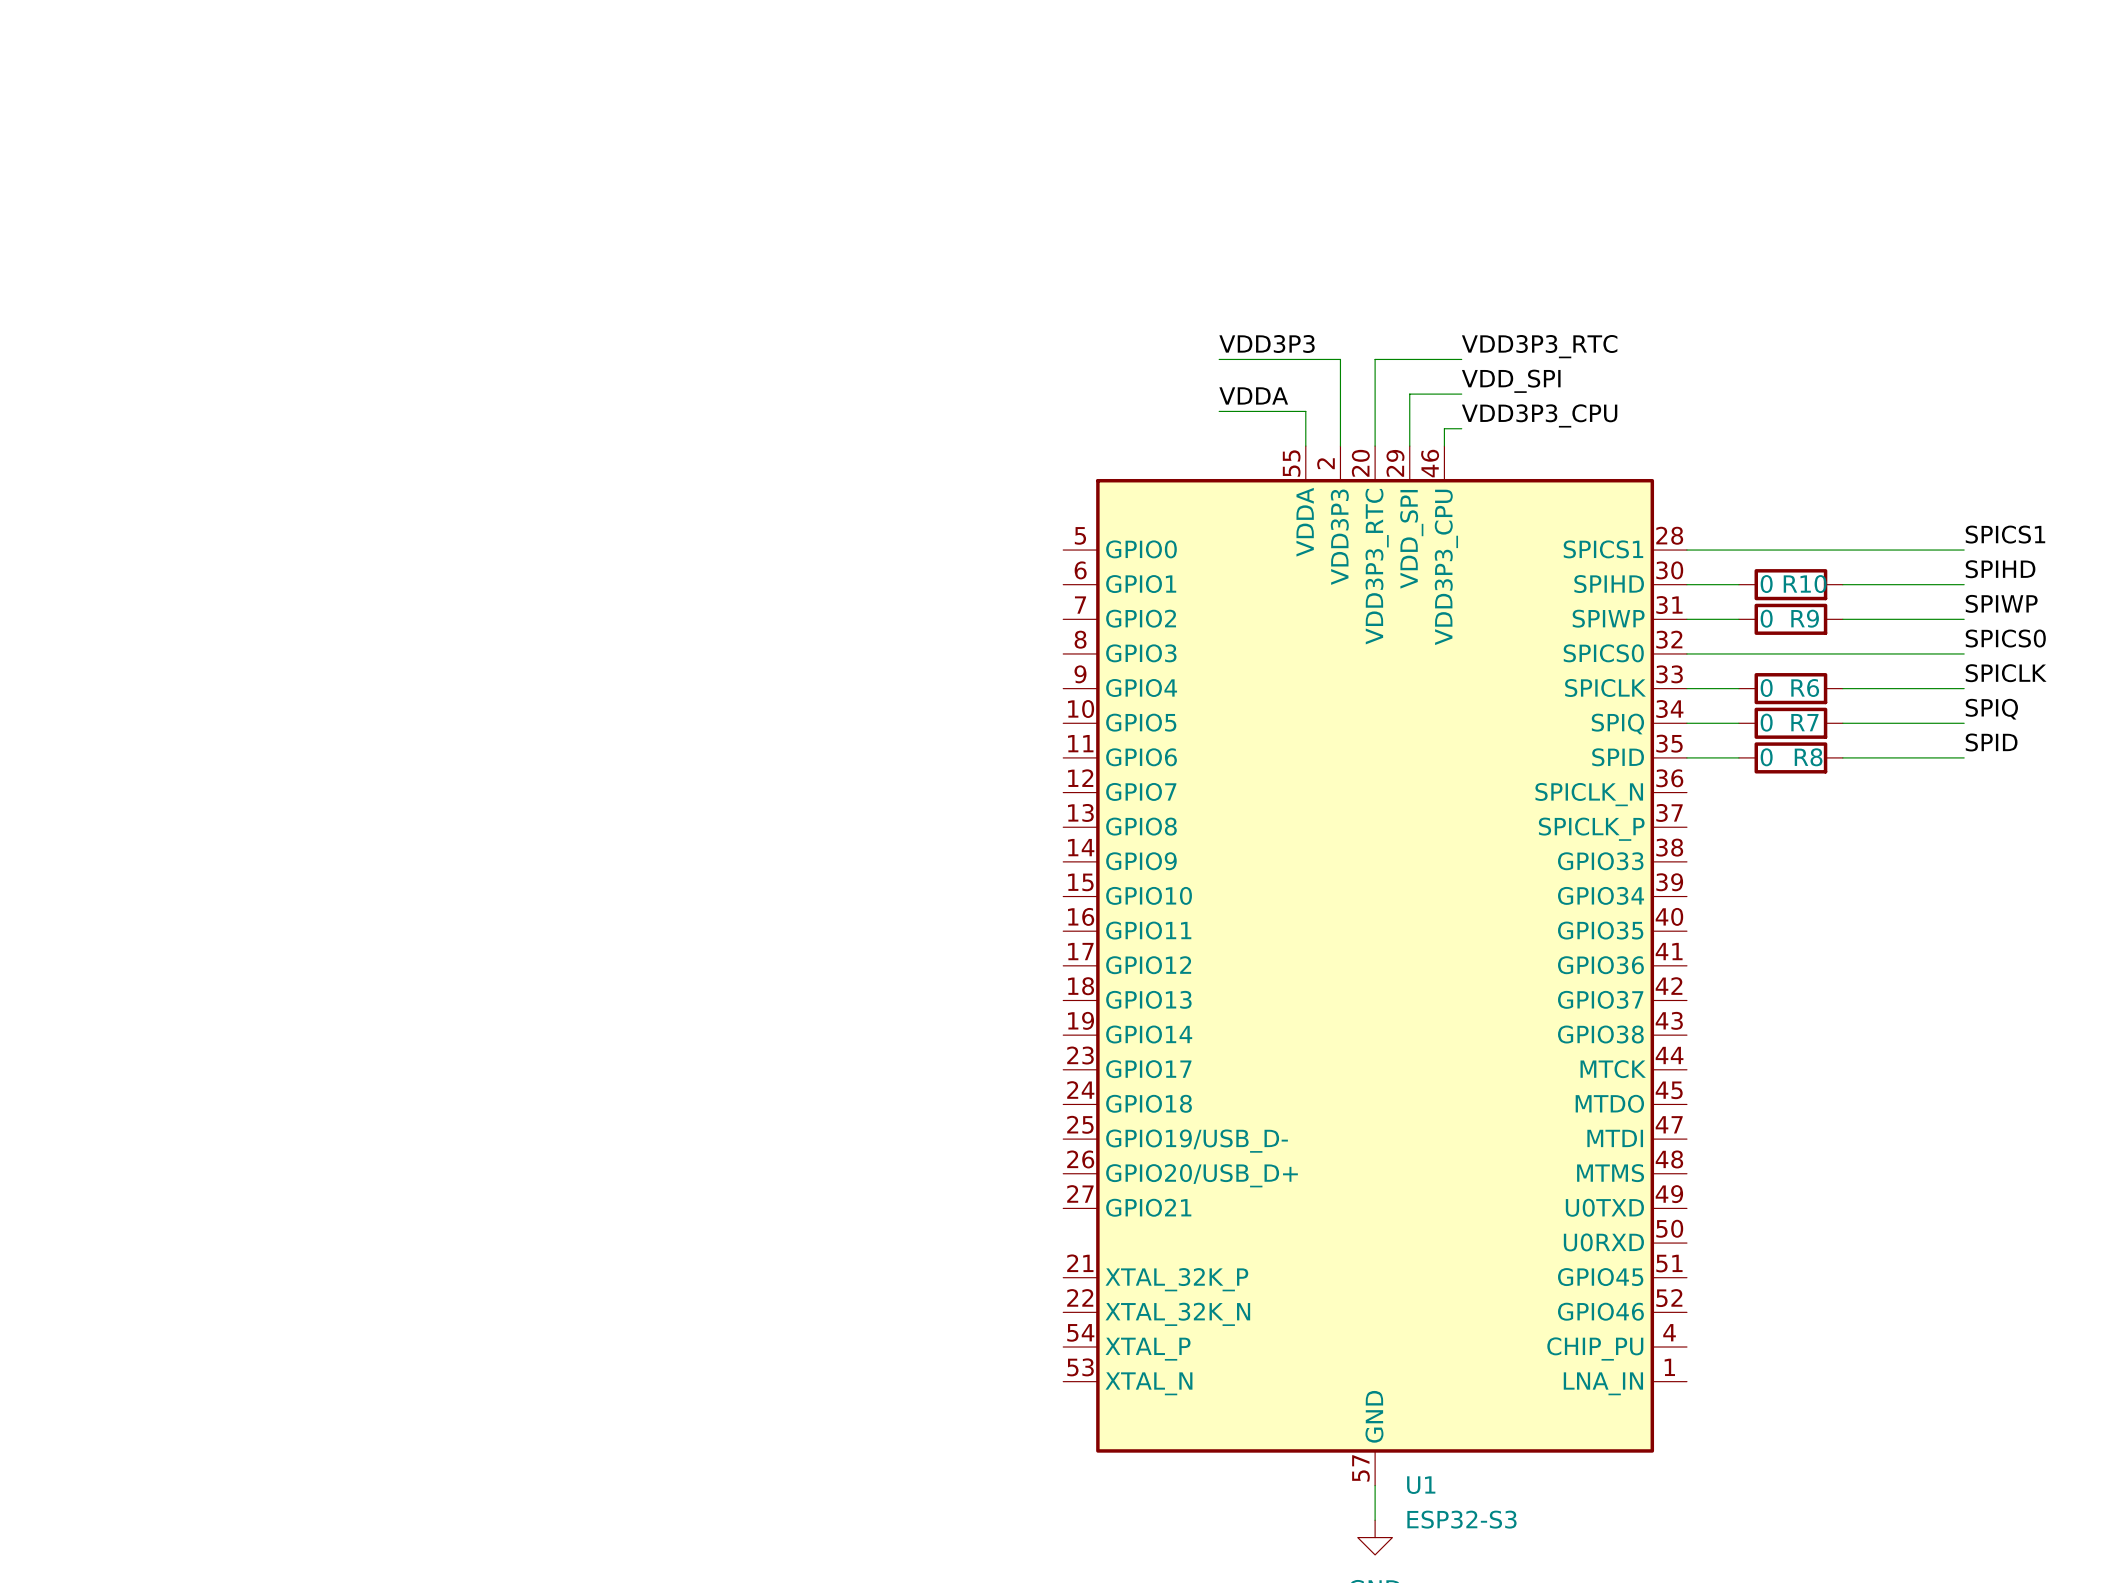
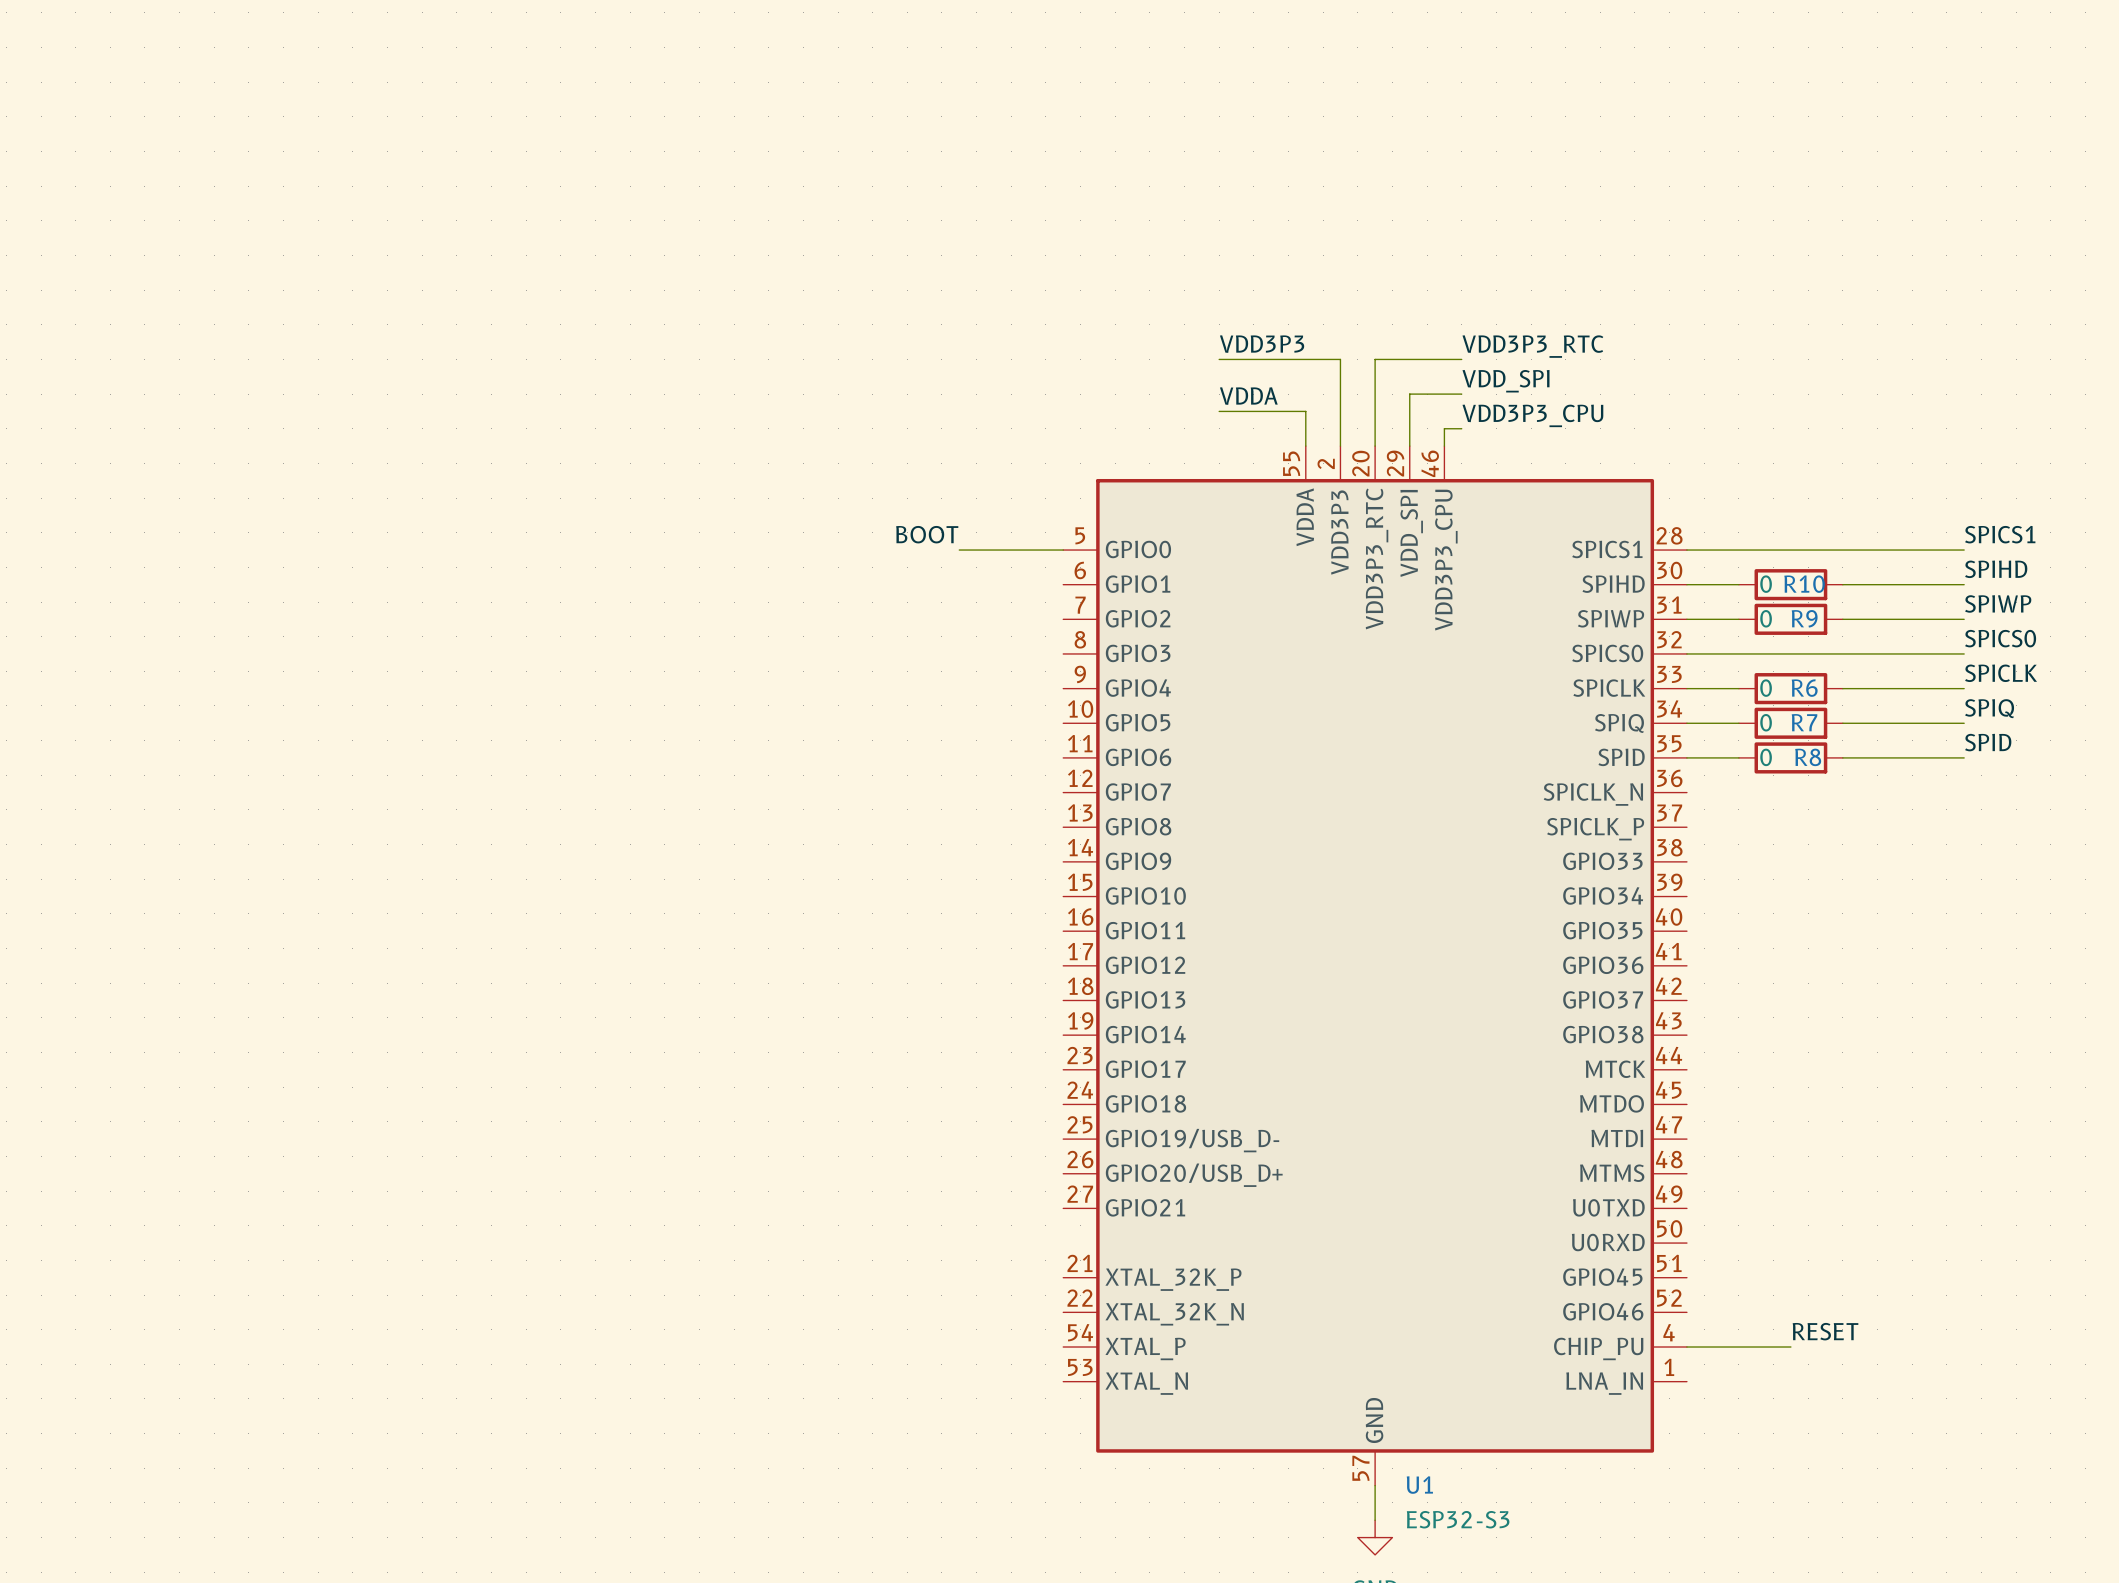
label: none -> BOOT (927, 534)
wire: none -> (959, 550) (1063, 550)
label: none -> RESET (1825, 1331)
wire: none -> (1686, 1347) (1790, 1347)

